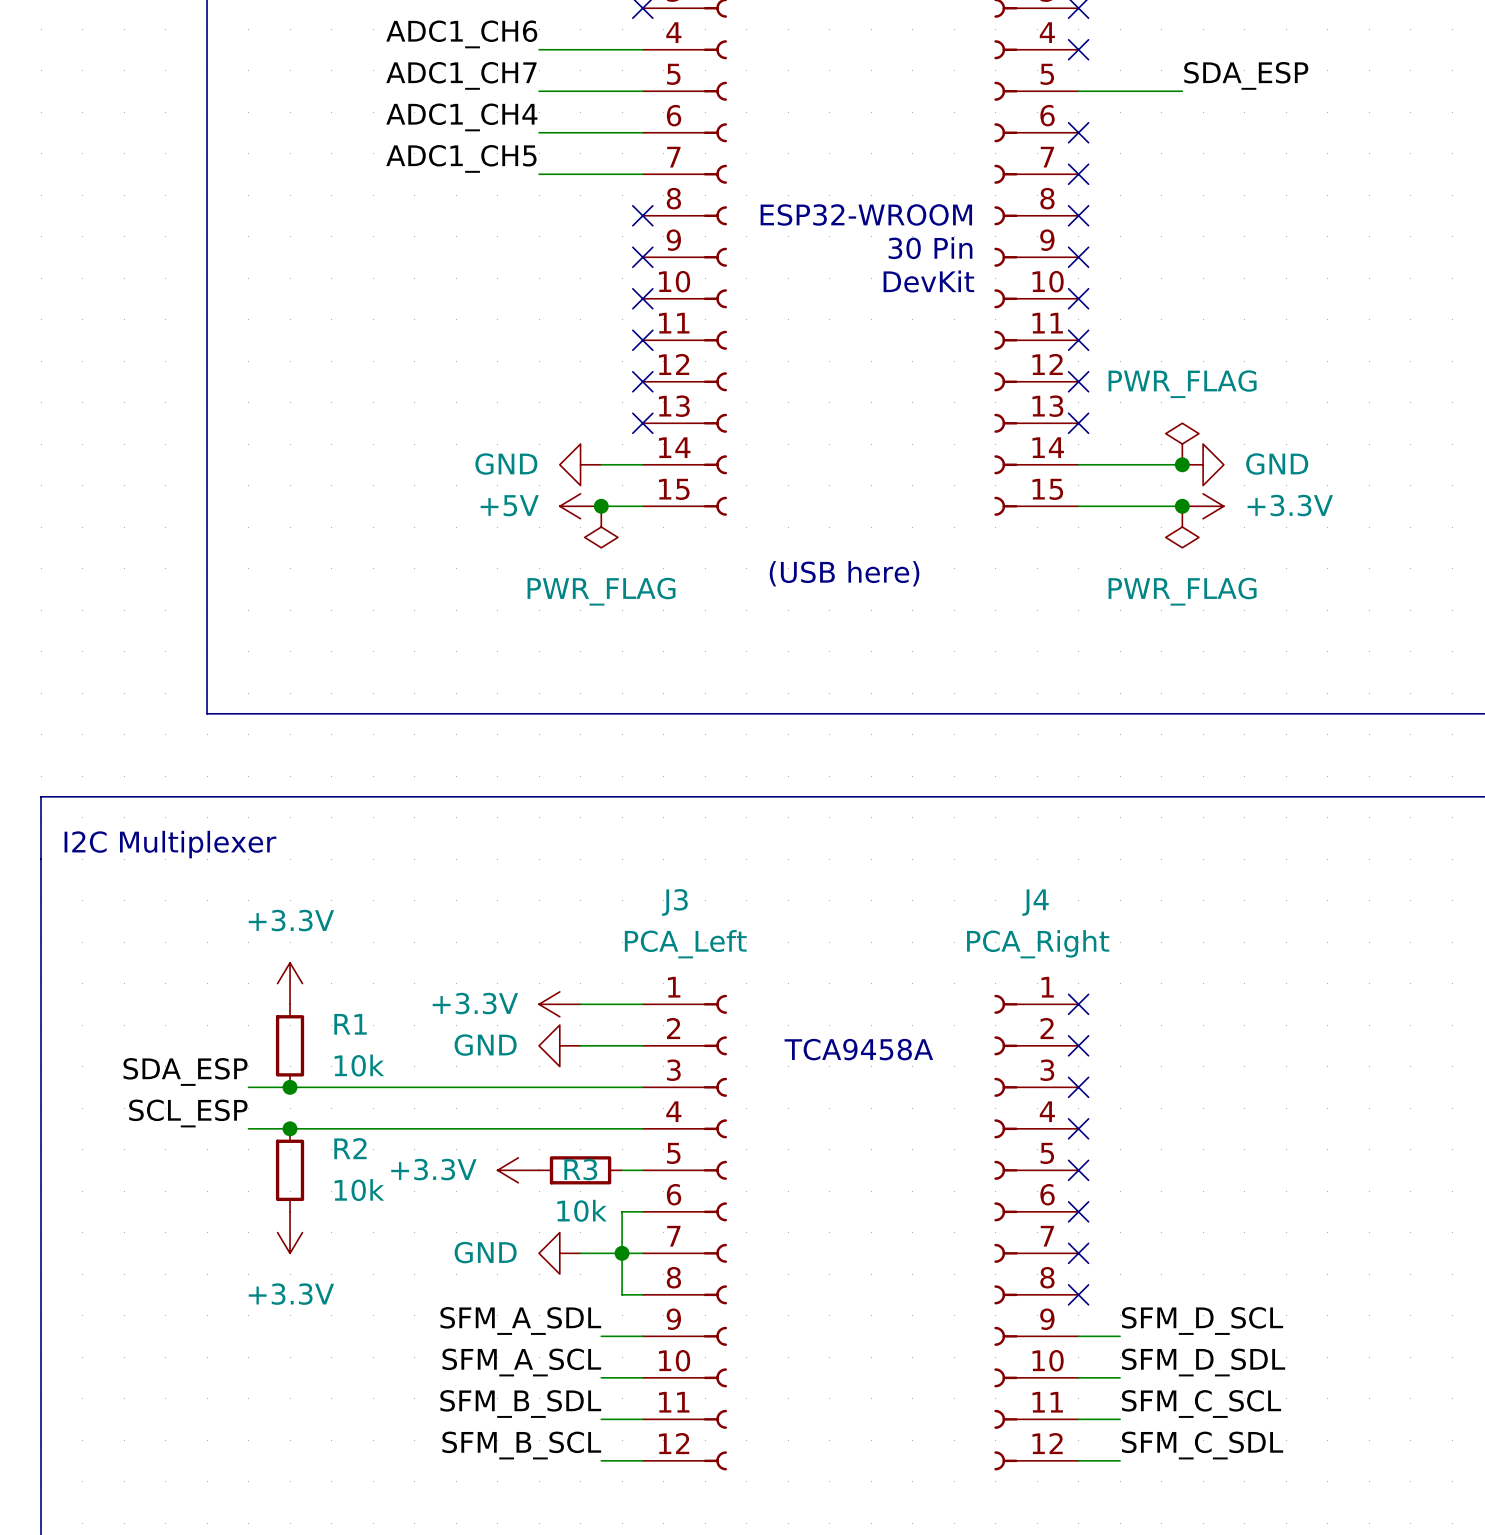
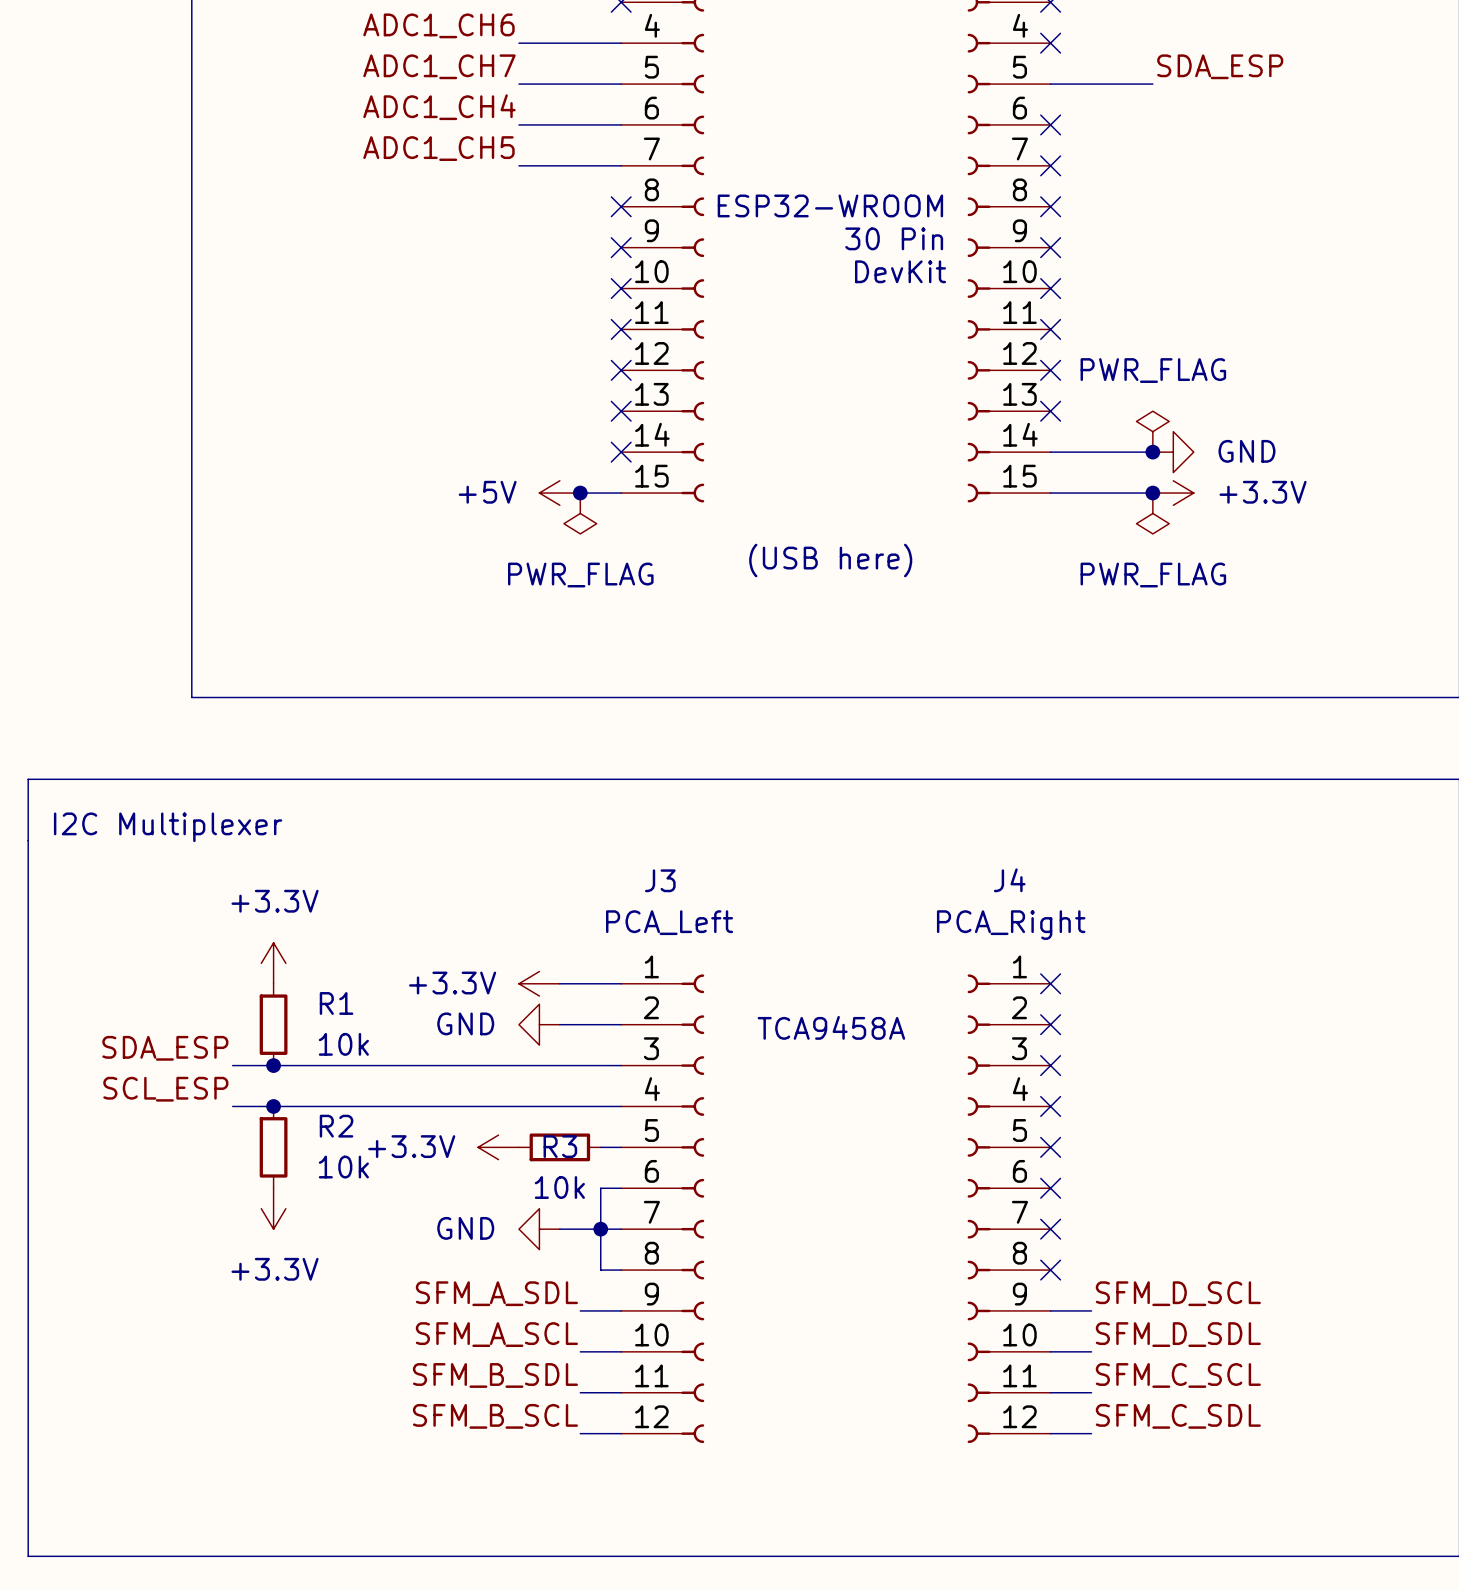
power symbol: GND (580, 464) -> none
wire: (601, 464) (642, 464) -> none
no-connect mark: none -> (621, 452)

